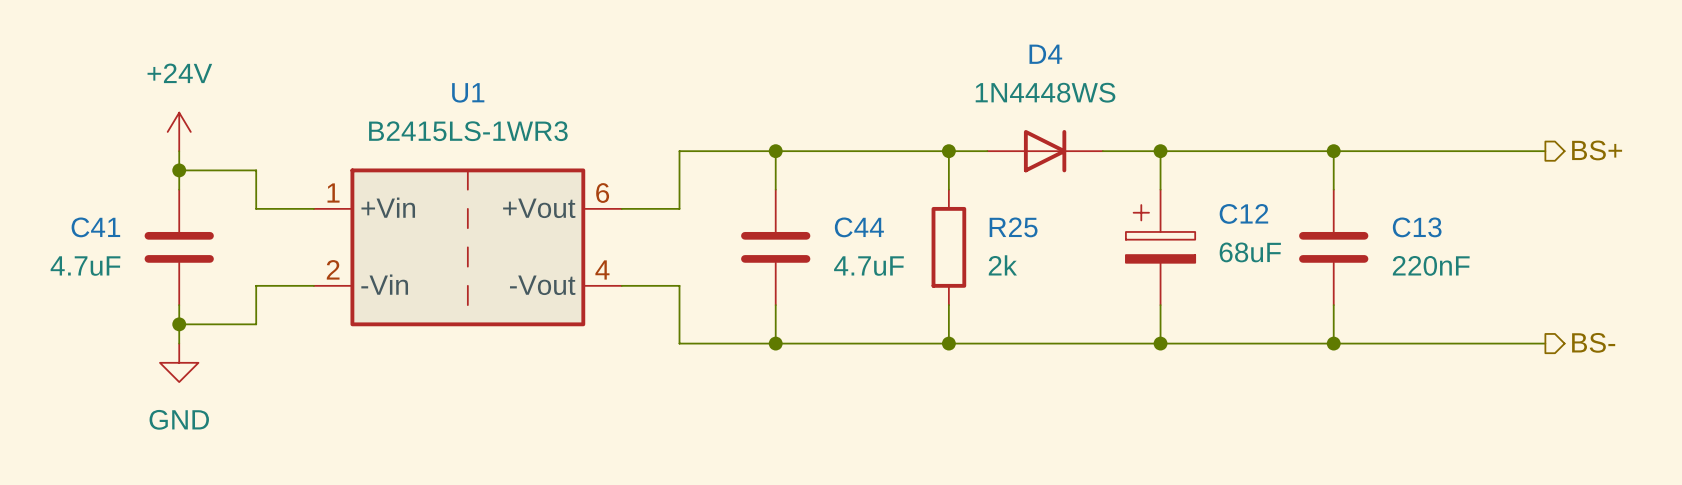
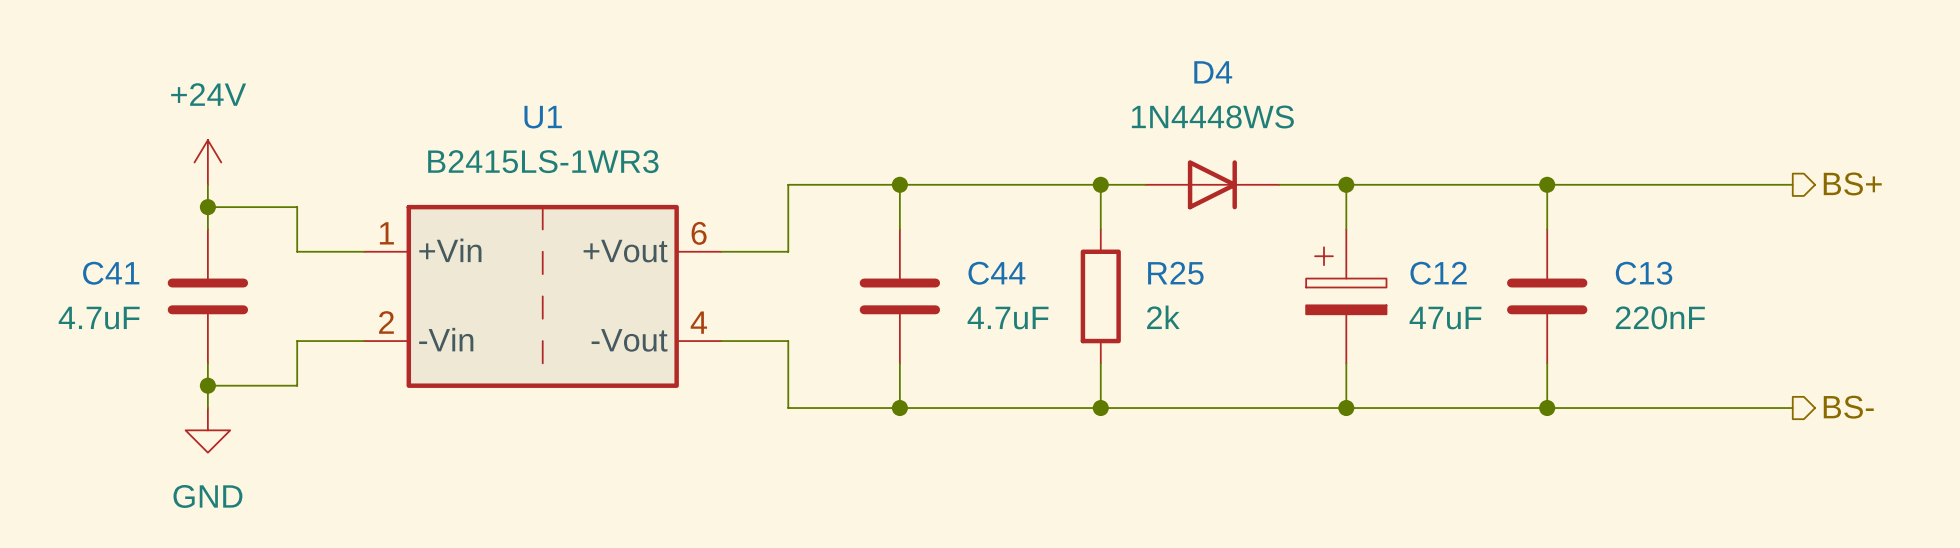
C12 name position: C12 (1243, 213) -> C12 (1438, 273)
C12 value: 68uF (1250, 252) -> 47uF (1445, 318)

